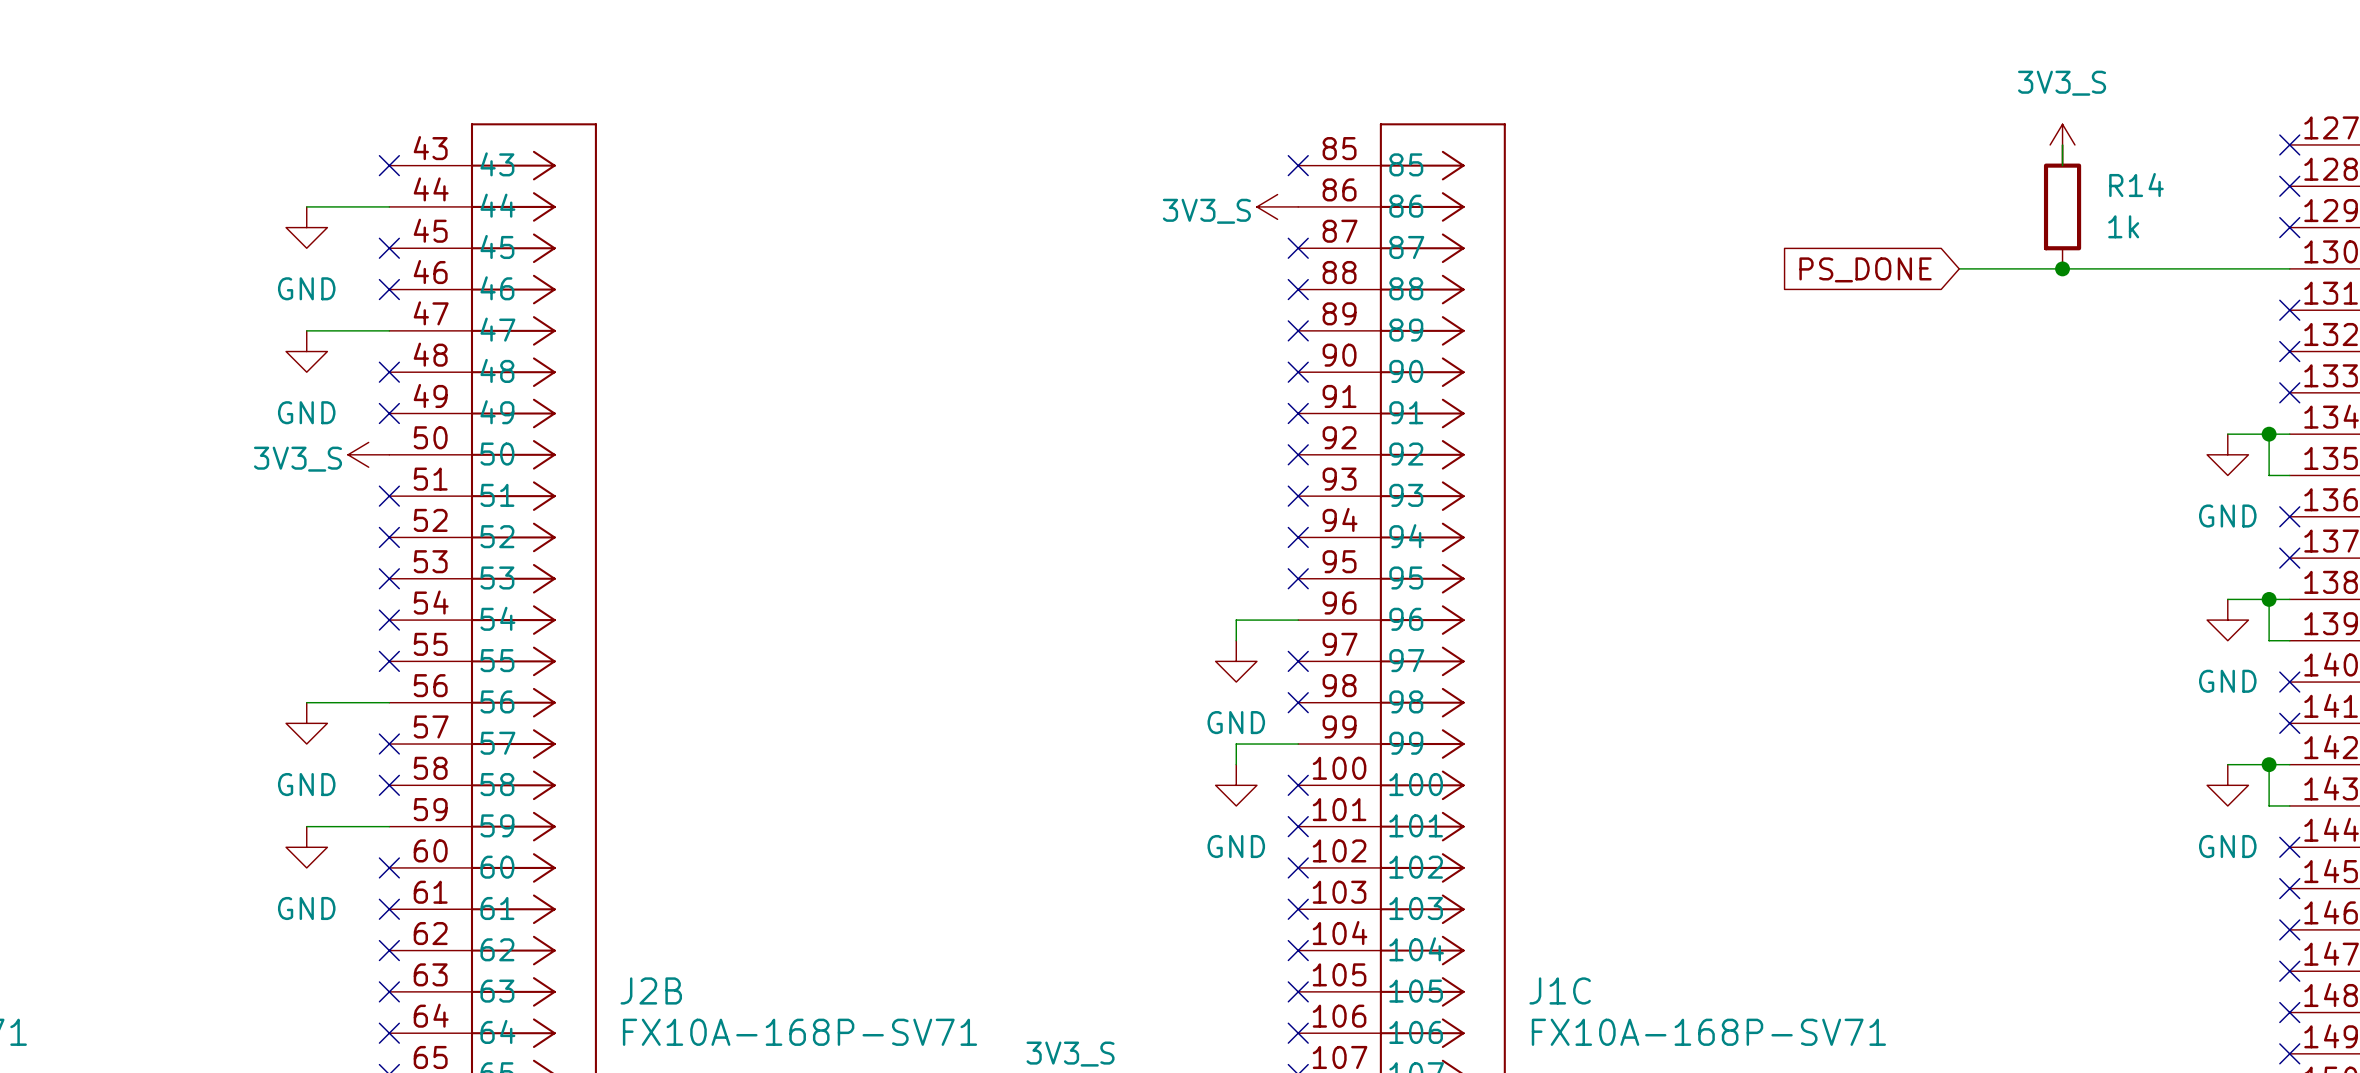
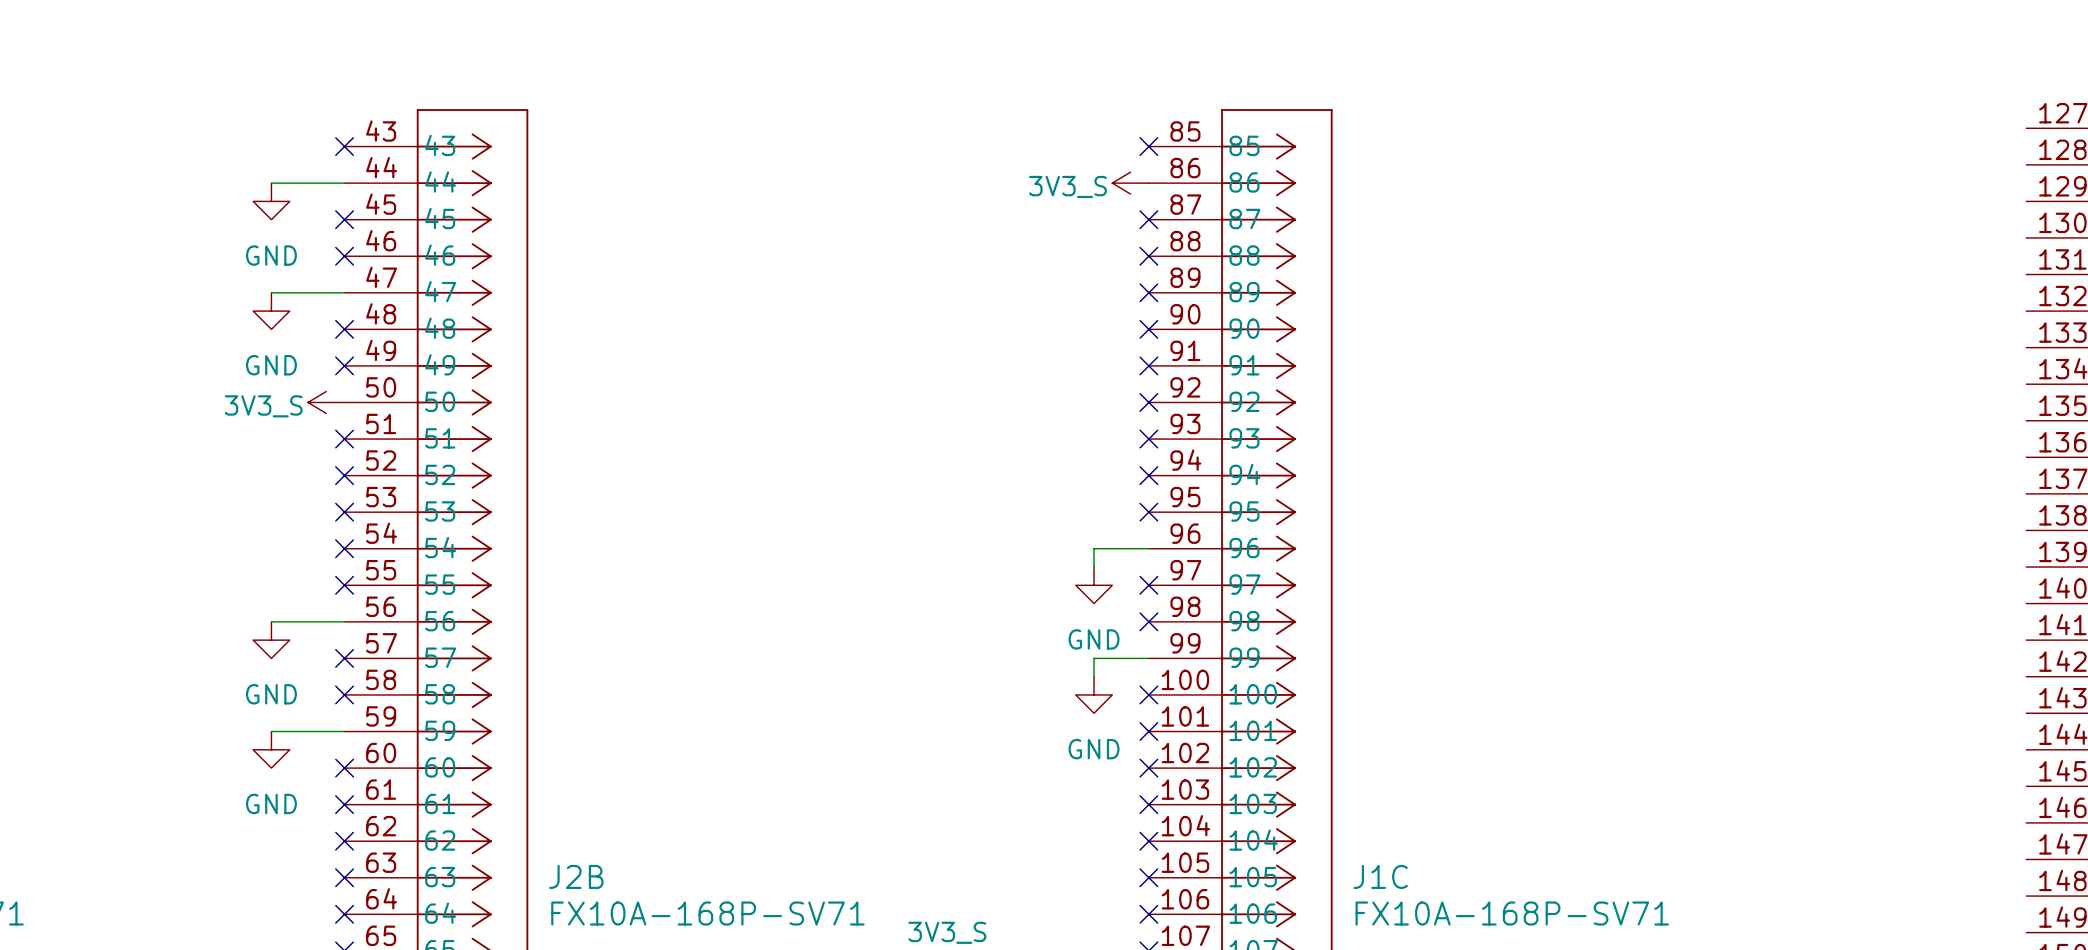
wire: (2062, 144) (2062, 165) -> none
power symbol: 3V3_S (2062, 144) -> none
no-connect mark: (2289, 144) -> none
no-connect mark: (2289, 186) -> none
R14: 1k (2062, 206) -> none
no-connect mark: (2289, 227) -> none
wire: (1959, 268) (2289, 268) -> none
junction: (2062, 268) -> none
global label: PS_DONE (1865, 269) -> none
no-connect mark: (2289, 310) -> none
no-connect mark: (2289, 351) -> none
no-connect mark: (2289, 392) -> none
wire: (2227, 434) (2289, 434) -> none
wire: (2269, 434) (2269, 475) (2289, 475) -> none
junction: (2269, 434) -> none
power symbol: GND (2227, 454) -> none
no-connect mark: (2289, 516) -> none
no-connect mark: (2289, 558) -> none
wire: (2227, 599) (2289, 599) -> none
wire: (2269, 599) (2269, 640) (2289, 640) -> none
junction: (2269, 599) -> none
power symbol: GND (2227, 620) -> none
no-connect mark: (2289, 682) -> none
no-connect mark: (2289, 723) -> none
wire: (2227, 764) (2289, 764) -> none
wire: (2269, 764) (2269, 805) (2289, 805) -> none
junction: (2269, 764) -> none
power symbol: GND (2227, 785) -> none
no-connect mark: (2289, 847) -> none
no-connect mark: (2289, 888) -> none
no-connect mark: (2289, 929) -> none
no-connect mark: (2289, 971) -> none
no-connect mark: (2289, 1012) -> none
no-connect mark: (2289, 1053) -> none

